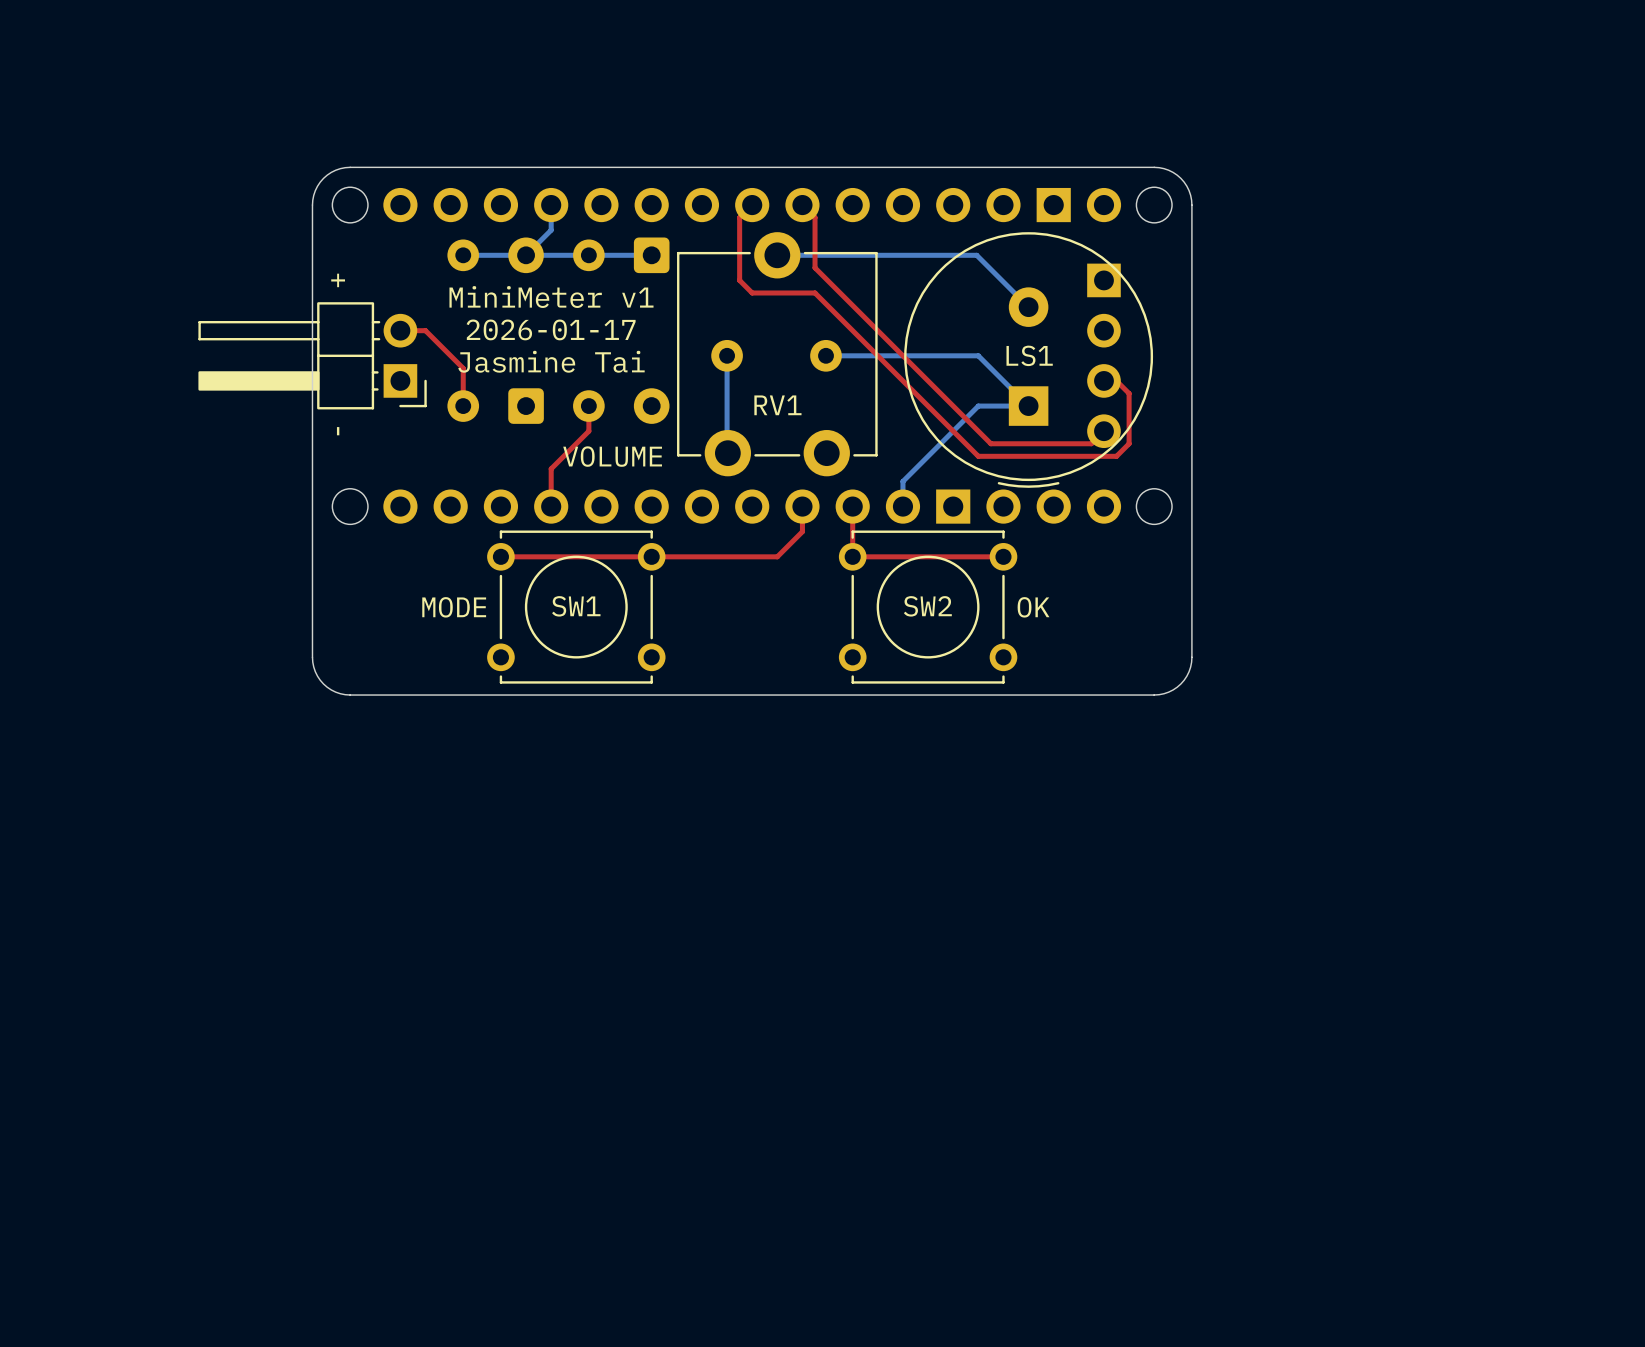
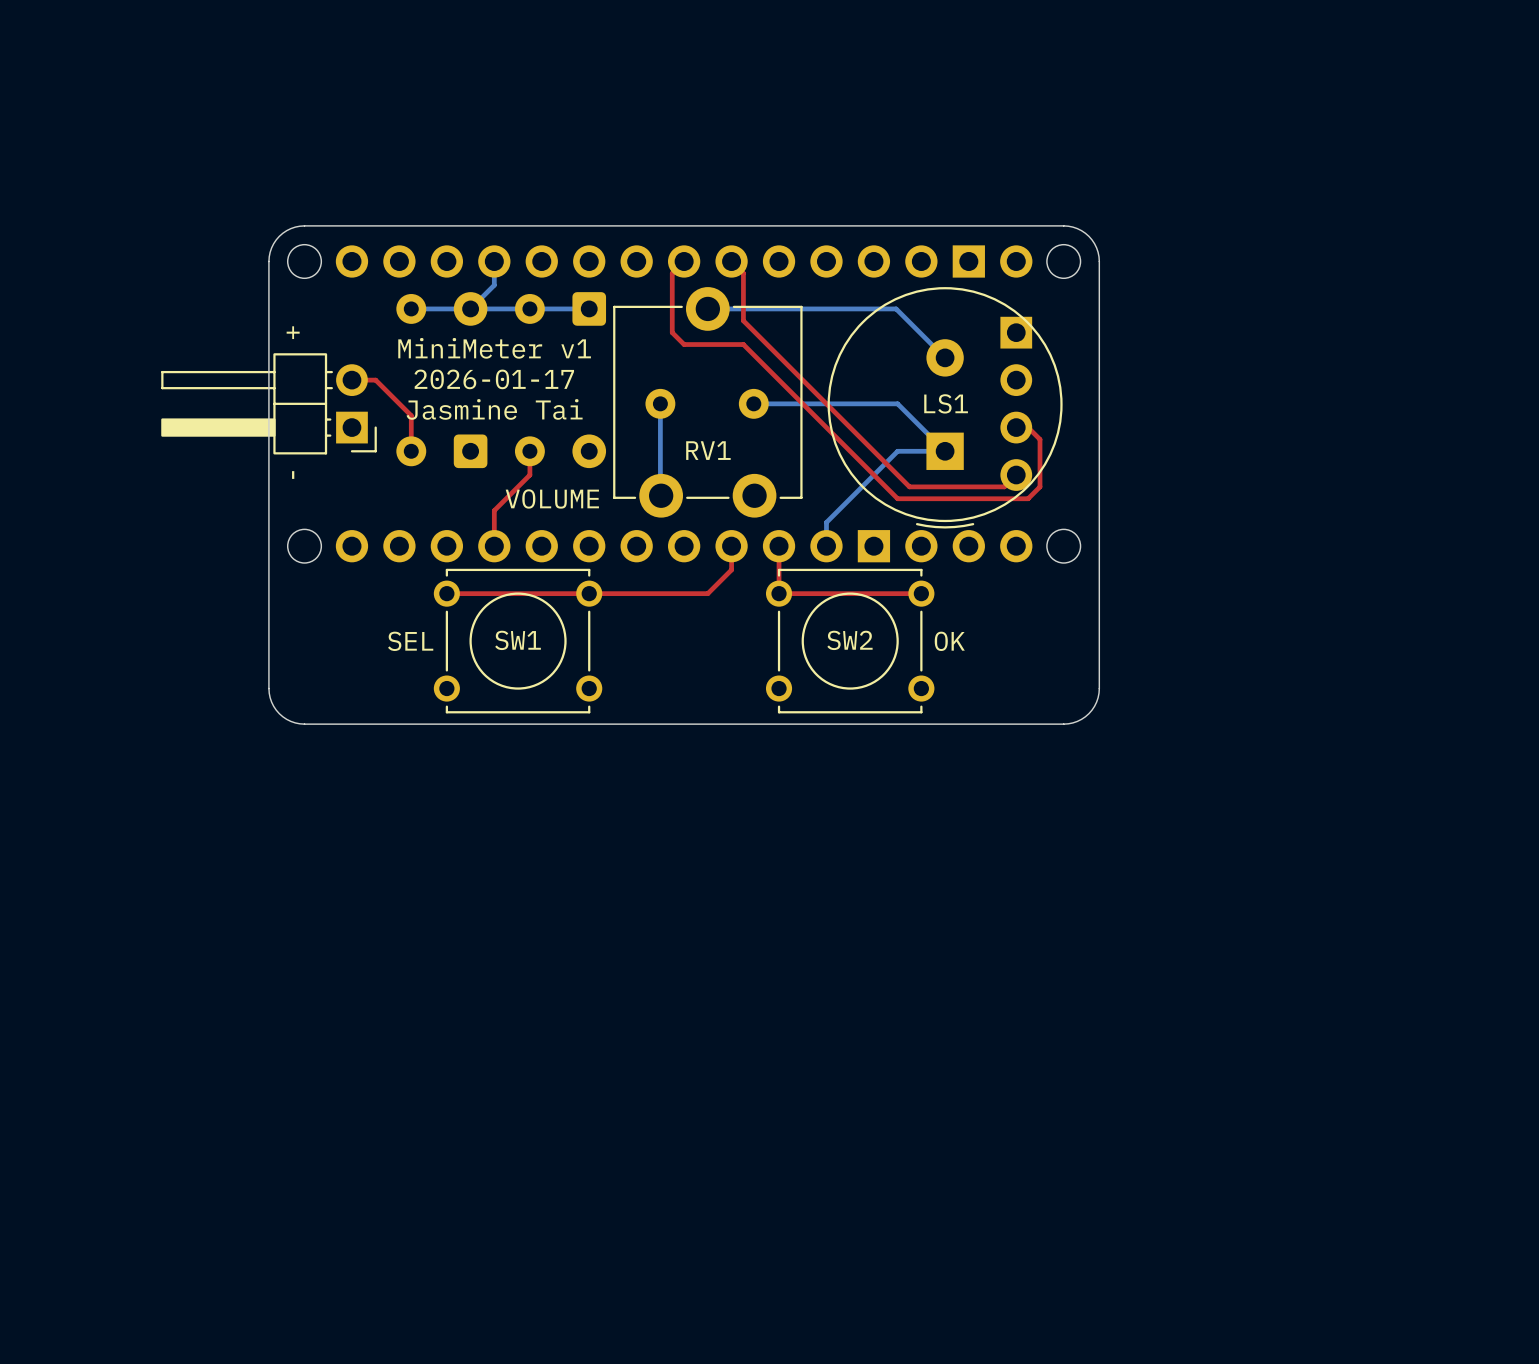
text: MODE (454, 607) -> SEL (410, 641)

